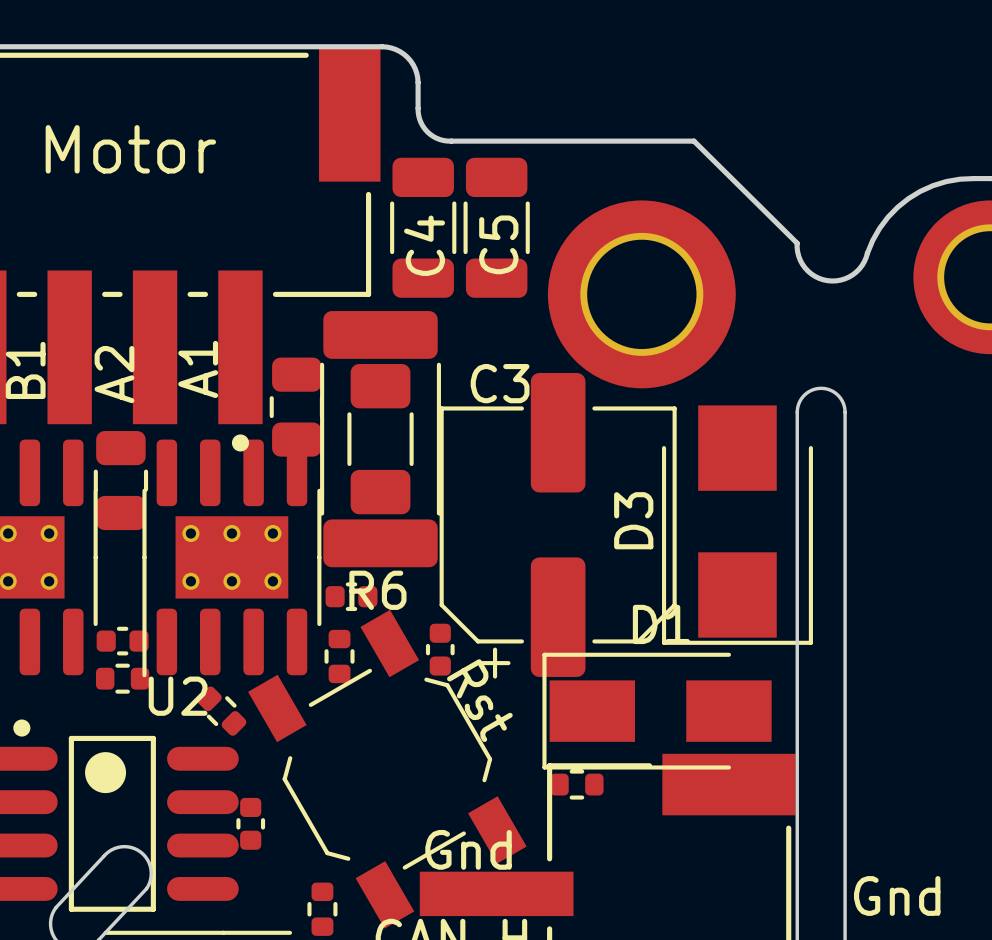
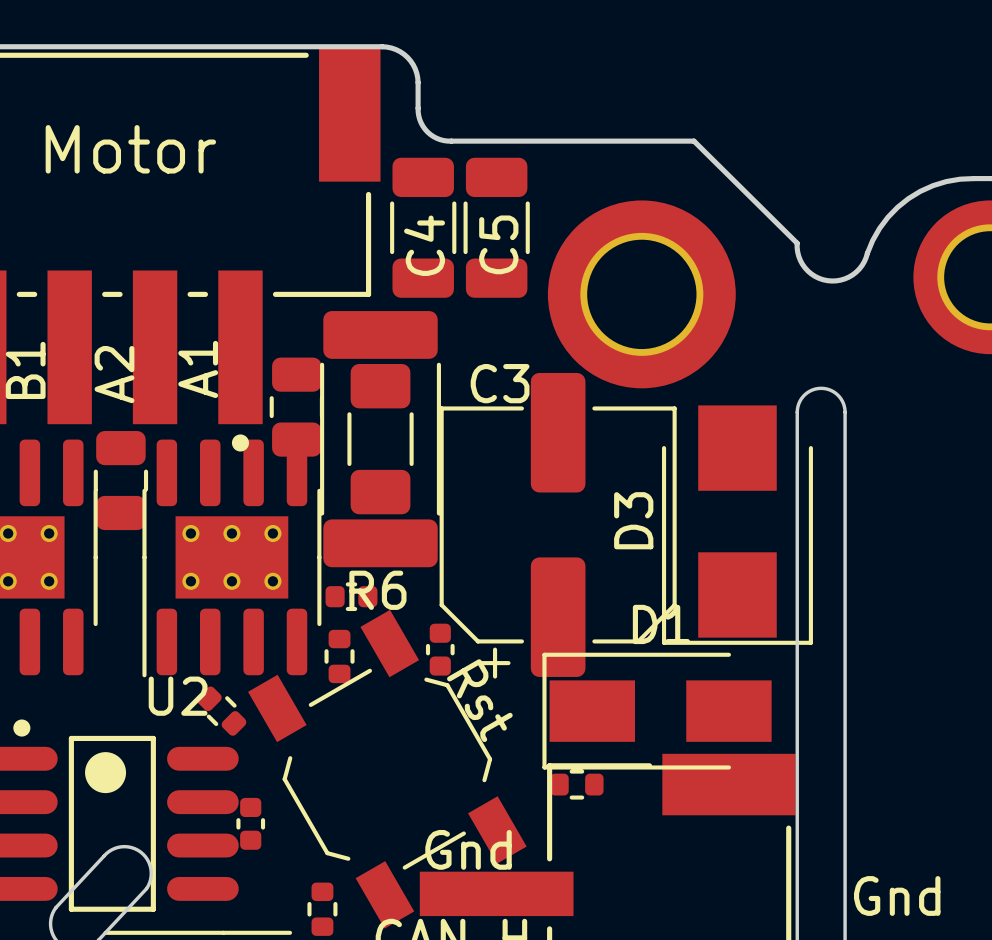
part: (122, 641) -> none
part: (122, 678) -> none

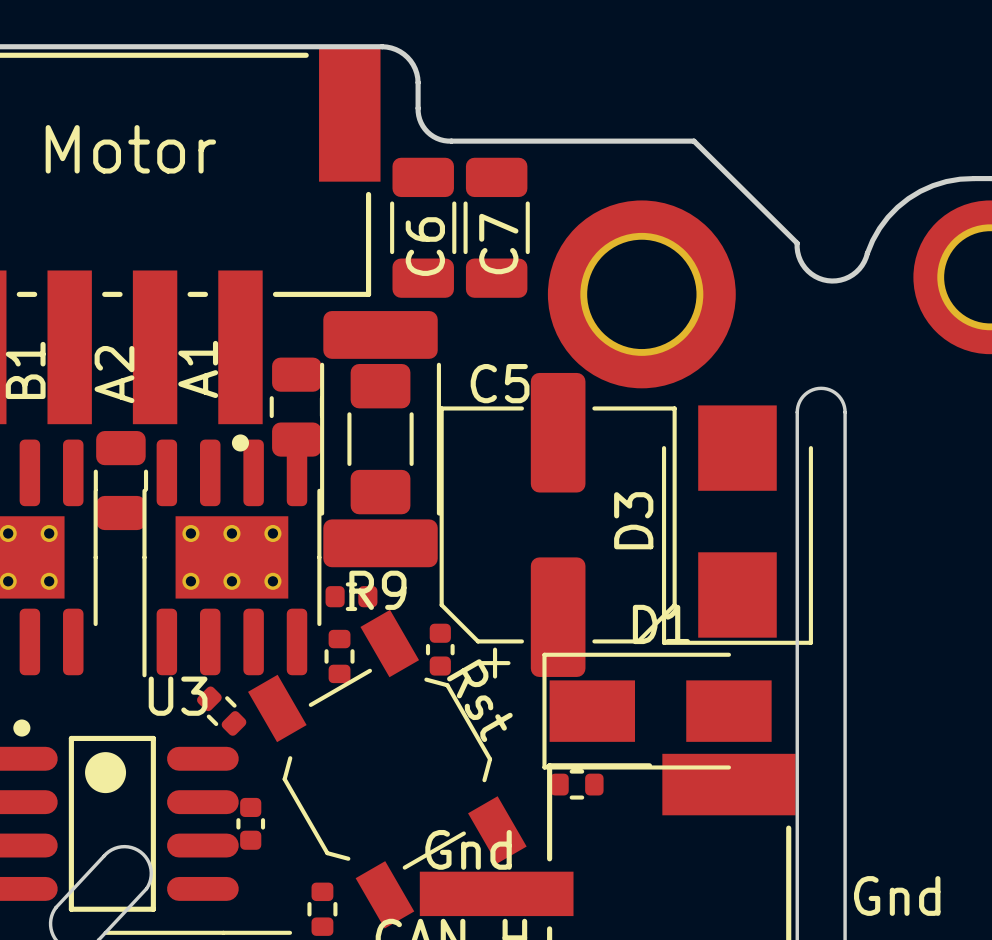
C5 name: C5 (498, 244) -> C7 (498, 244)
C4 name: C4 (424, 245) -> C6 (425, 246)
C3 name: C3 (500, 383) -> C5 (500, 383)
R6 name: R6 (377, 590) -> R9 (377, 590)
U2 name: U2 (178, 696) -> U3 (178, 696)

